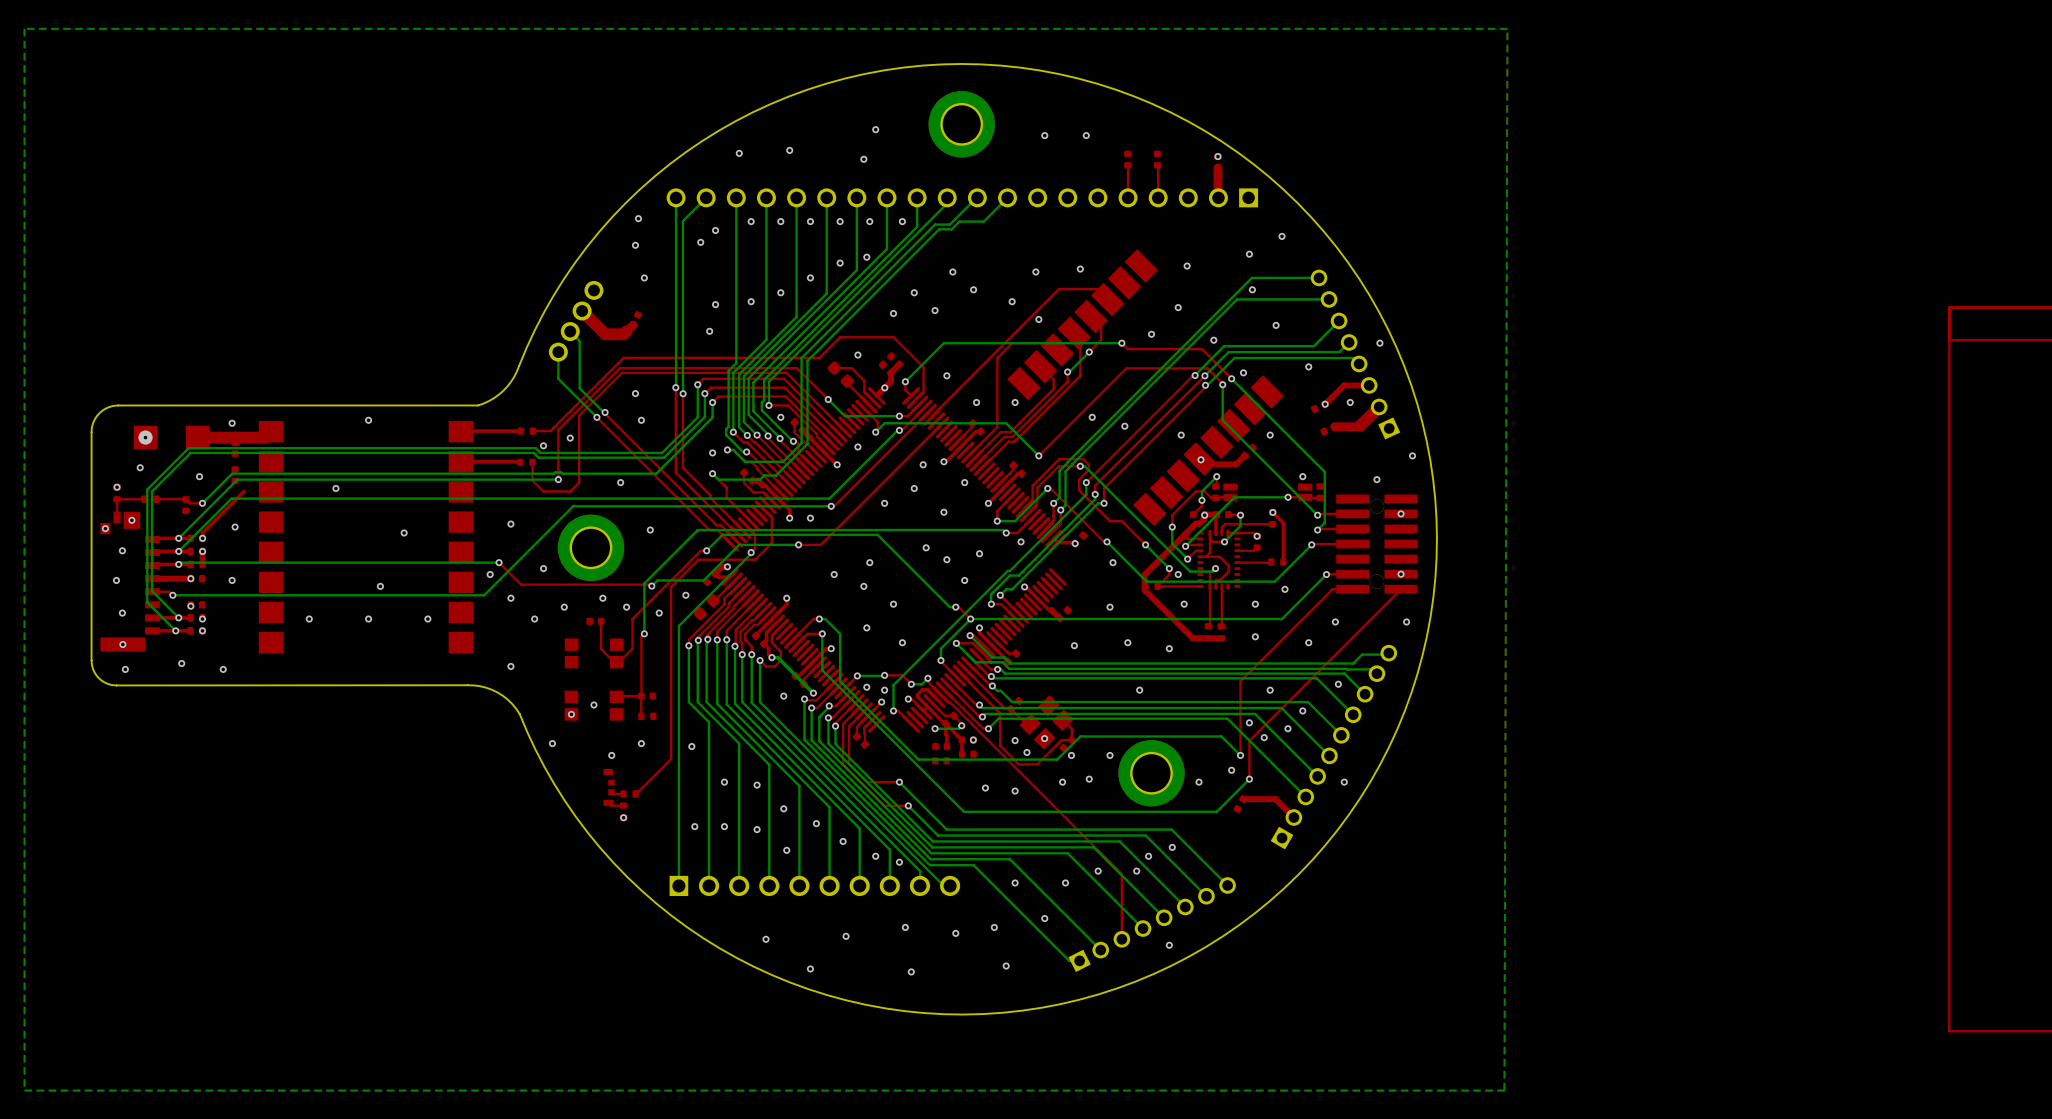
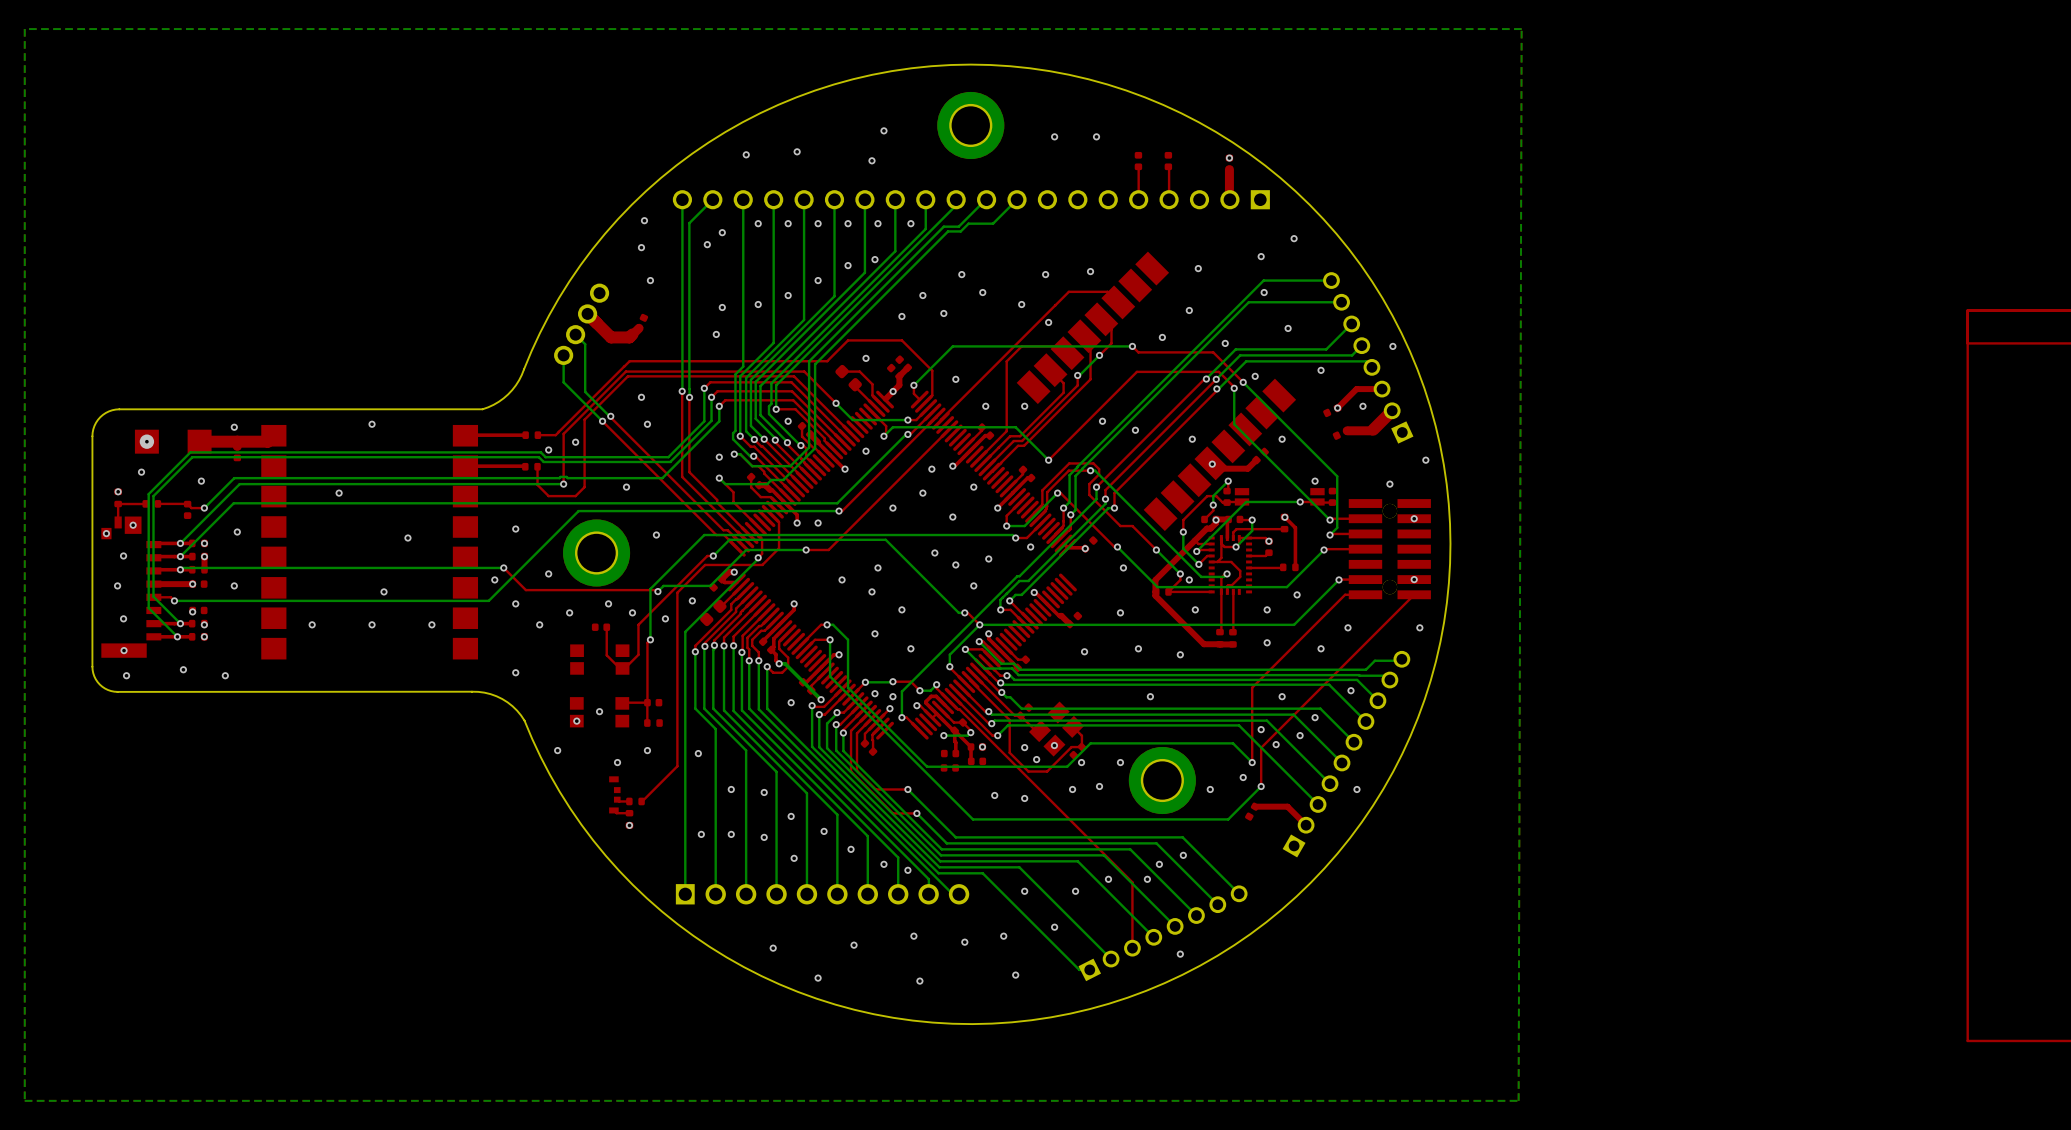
part: (235, 475) -> none
top track: (244, 491) (202, 532) (202, 538) -> none

